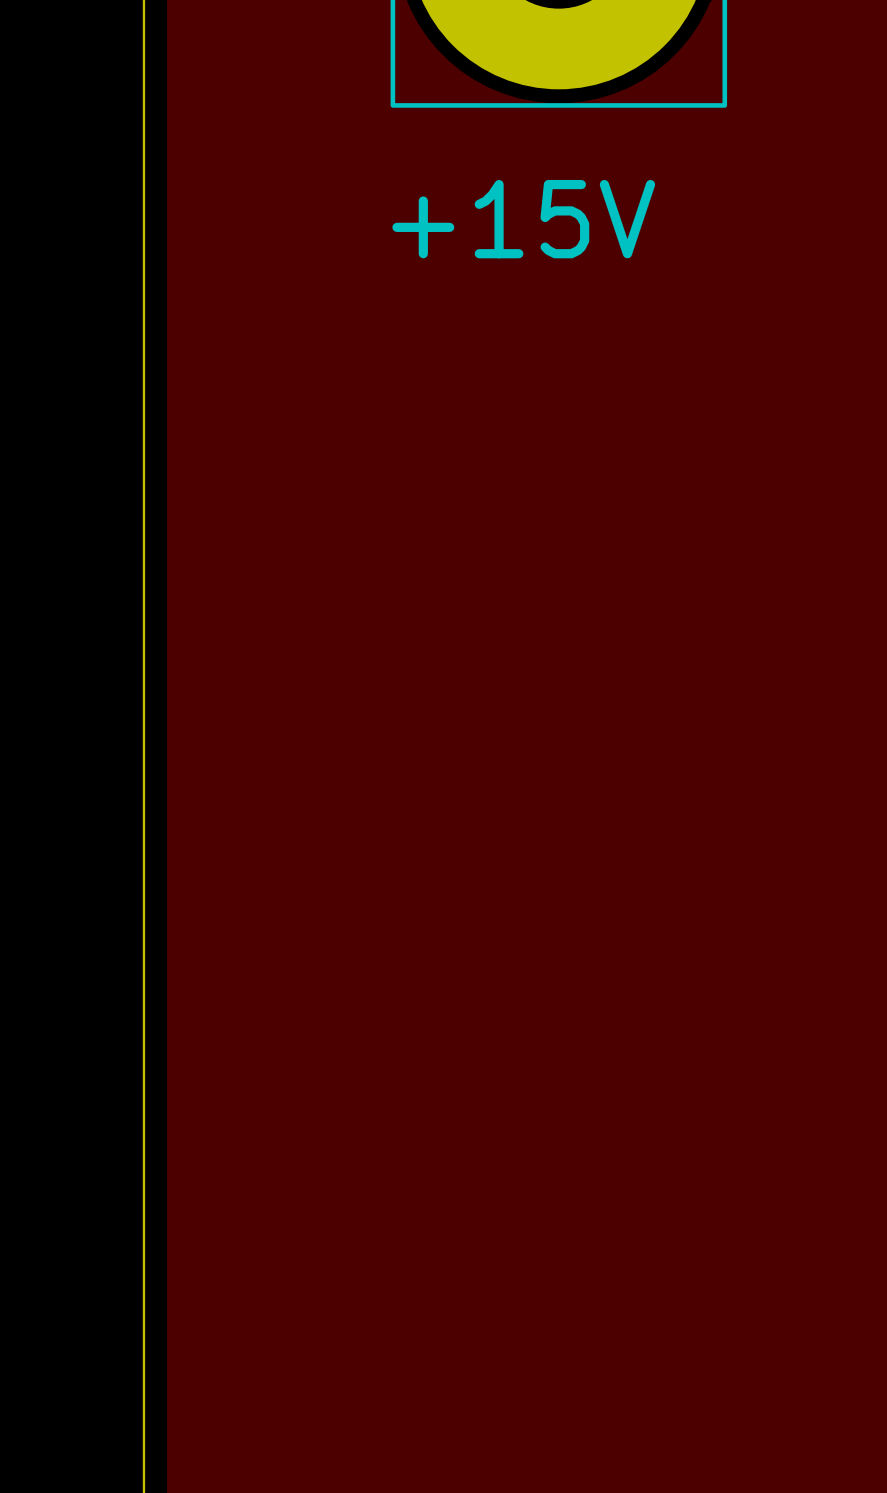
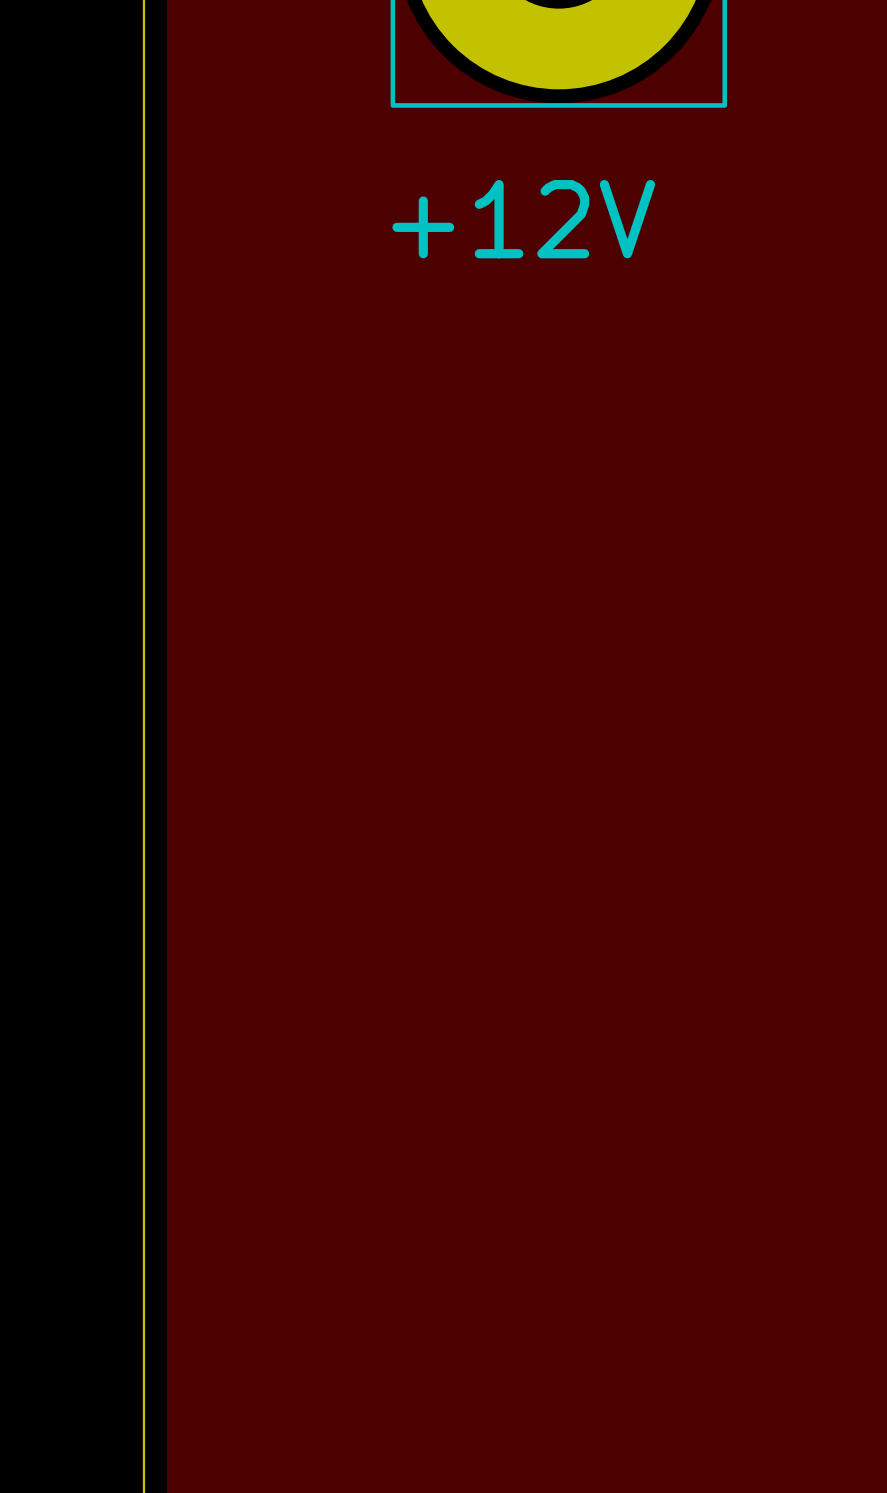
text: +15V (523, 219) -> +12V (523, 219)

